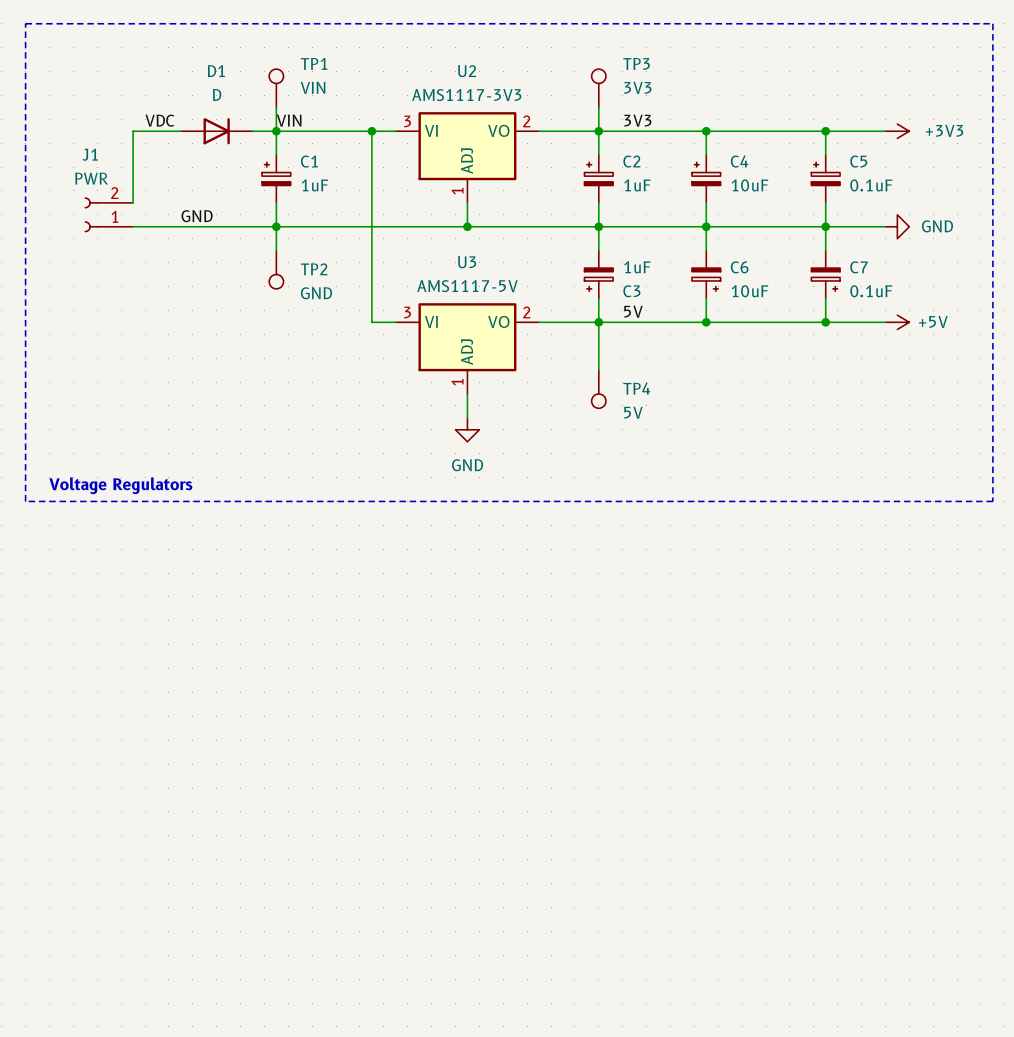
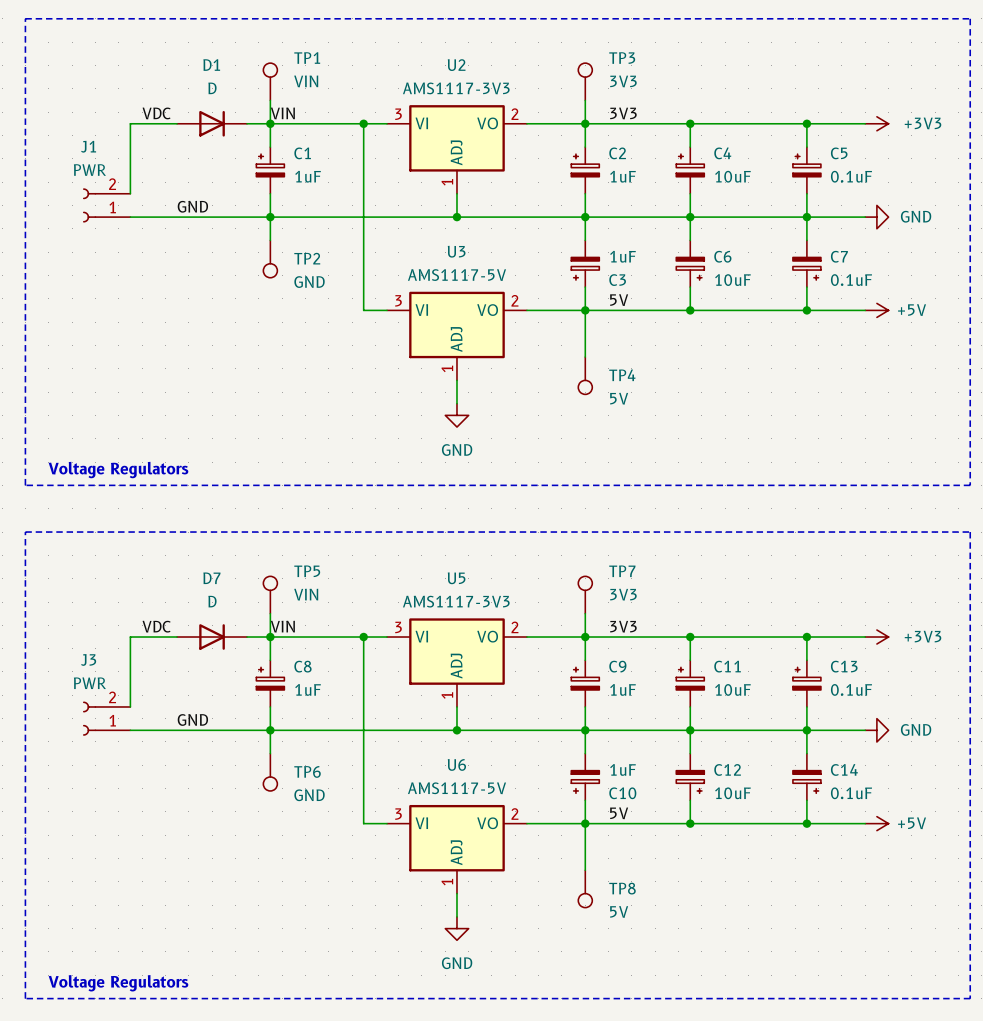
line: none -> (25, 532) (970, 532) (970, 998) (25, 998) (25, 532)
TP5: none -> VIN (270, 595)
TP7: none -> 3V3 (585, 595)
wire: none -> (270, 613) (270, 660)
wire: none -> (585, 613) (585, 660)
label: none -> VDC (156, 626)
label: none -> VIN (282, 626)
label: none -> 3V3 (623, 626)
wire: none -> (177, 637) (130, 637) (130, 706)
D7: none -> D (212, 637)
wire: none -> (247, 637) (387, 637)
junction: none -> (270, 637)
wire: none -> (363, 637) (363, 823) (387, 823)
junction: none -> (363, 637)
wire: none -> (526, 637) (865, 637)
junction: none -> (585, 637)
wire: none -> (690, 637) (690, 660)
junction: none -> (690, 637)
wire: none -> (806, 637) (806, 660)
junction: none -> (806, 637)
power symbol: none -> +3V3 (876, 637)
U5: none -> AMS1117-3V3 (456, 662)
C8: none -> 1uF (270, 683)
C9: none -> 1uF (585, 683)
C11: none -> 10uF (690, 683)
C13: none -> 0.1uF (806, 683)
wire: none -> (270, 706) (270, 753)
wire: none -> (456, 706) (456, 730)
wire: none -> (585, 706) (585, 753)
wire: none -> (690, 706) (690, 753)
wire: none -> (806, 706) (806, 753)
J3: none -> PWR (106, 718)
label: none -> GND (192, 719)
wire: none -> (130, 730) (865, 730)
junction: none -> (270, 730)
junction: none -> (456, 730)
junction: none -> (585, 730)
junction: none -> (690, 730)
junction: none -> (806, 730)
power symbol: none -> GND (876, 730)
TP6: none -> GND (270, 772)
C10: none -> 1uF (585, 776)
C12: none -> 10uF (690, 776)
C14: none -> 0.1uF (806, 776)
wire: none -> (585, 800) (585, 870)
wire: none -> (690, 800) (690, 823)
wire: none -> (806, 800) (806, 823)
label: none -> 5V (619, 813)
wire: none -> (526, 823) (865, 823)
junction: none -> (585, 823)
junction: none -> (690, 823)
junction: none -> (806, 823)
power symbol: none -> +5V (876, 823)
U6: none -> AMS1117-5V (456, 849)
TP8: none -> 5V (585, 888)
wire: none -> (456, 893) (456, 916)
power symbol: none -> GND (456, 928)
text: none -> Voltage Regulators (118, 983)

